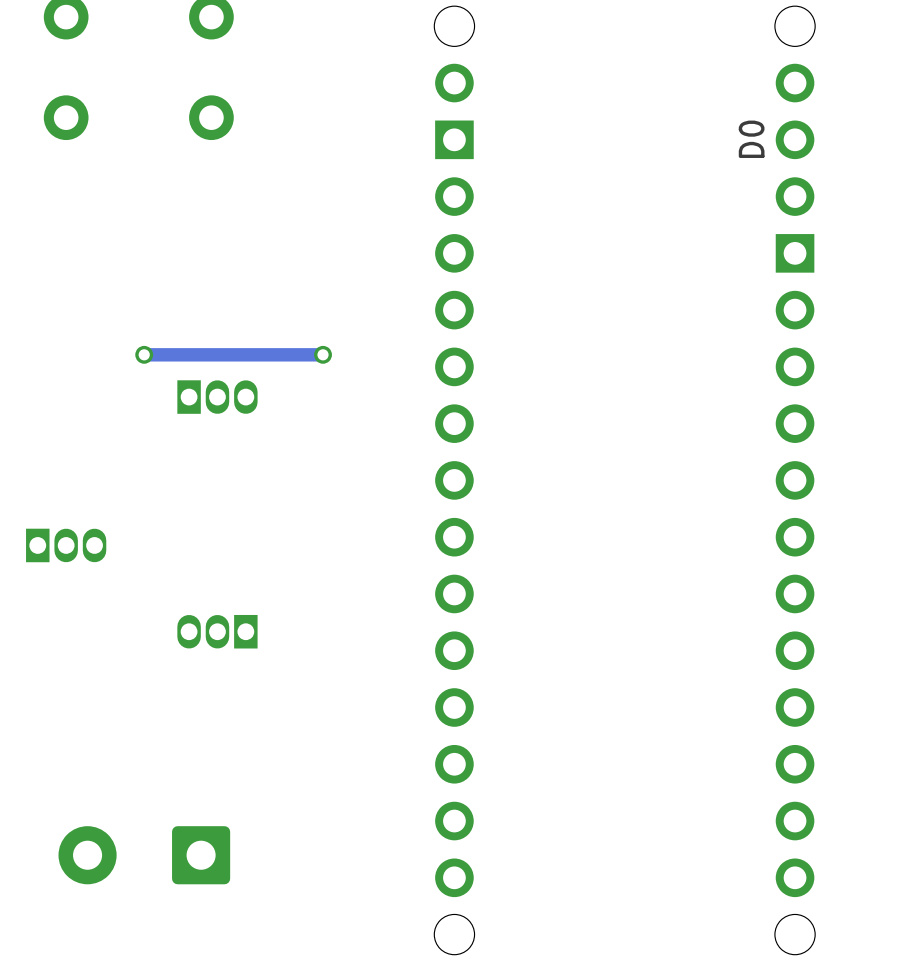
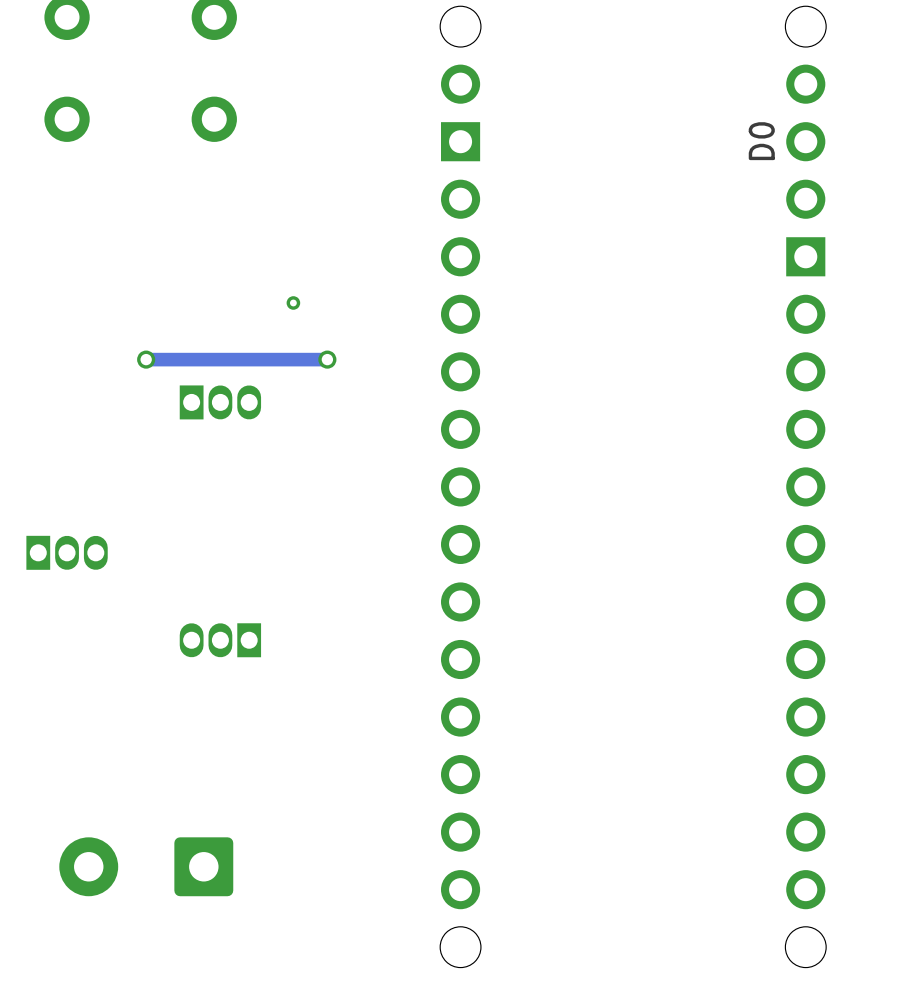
via: none -> (293, 302)

